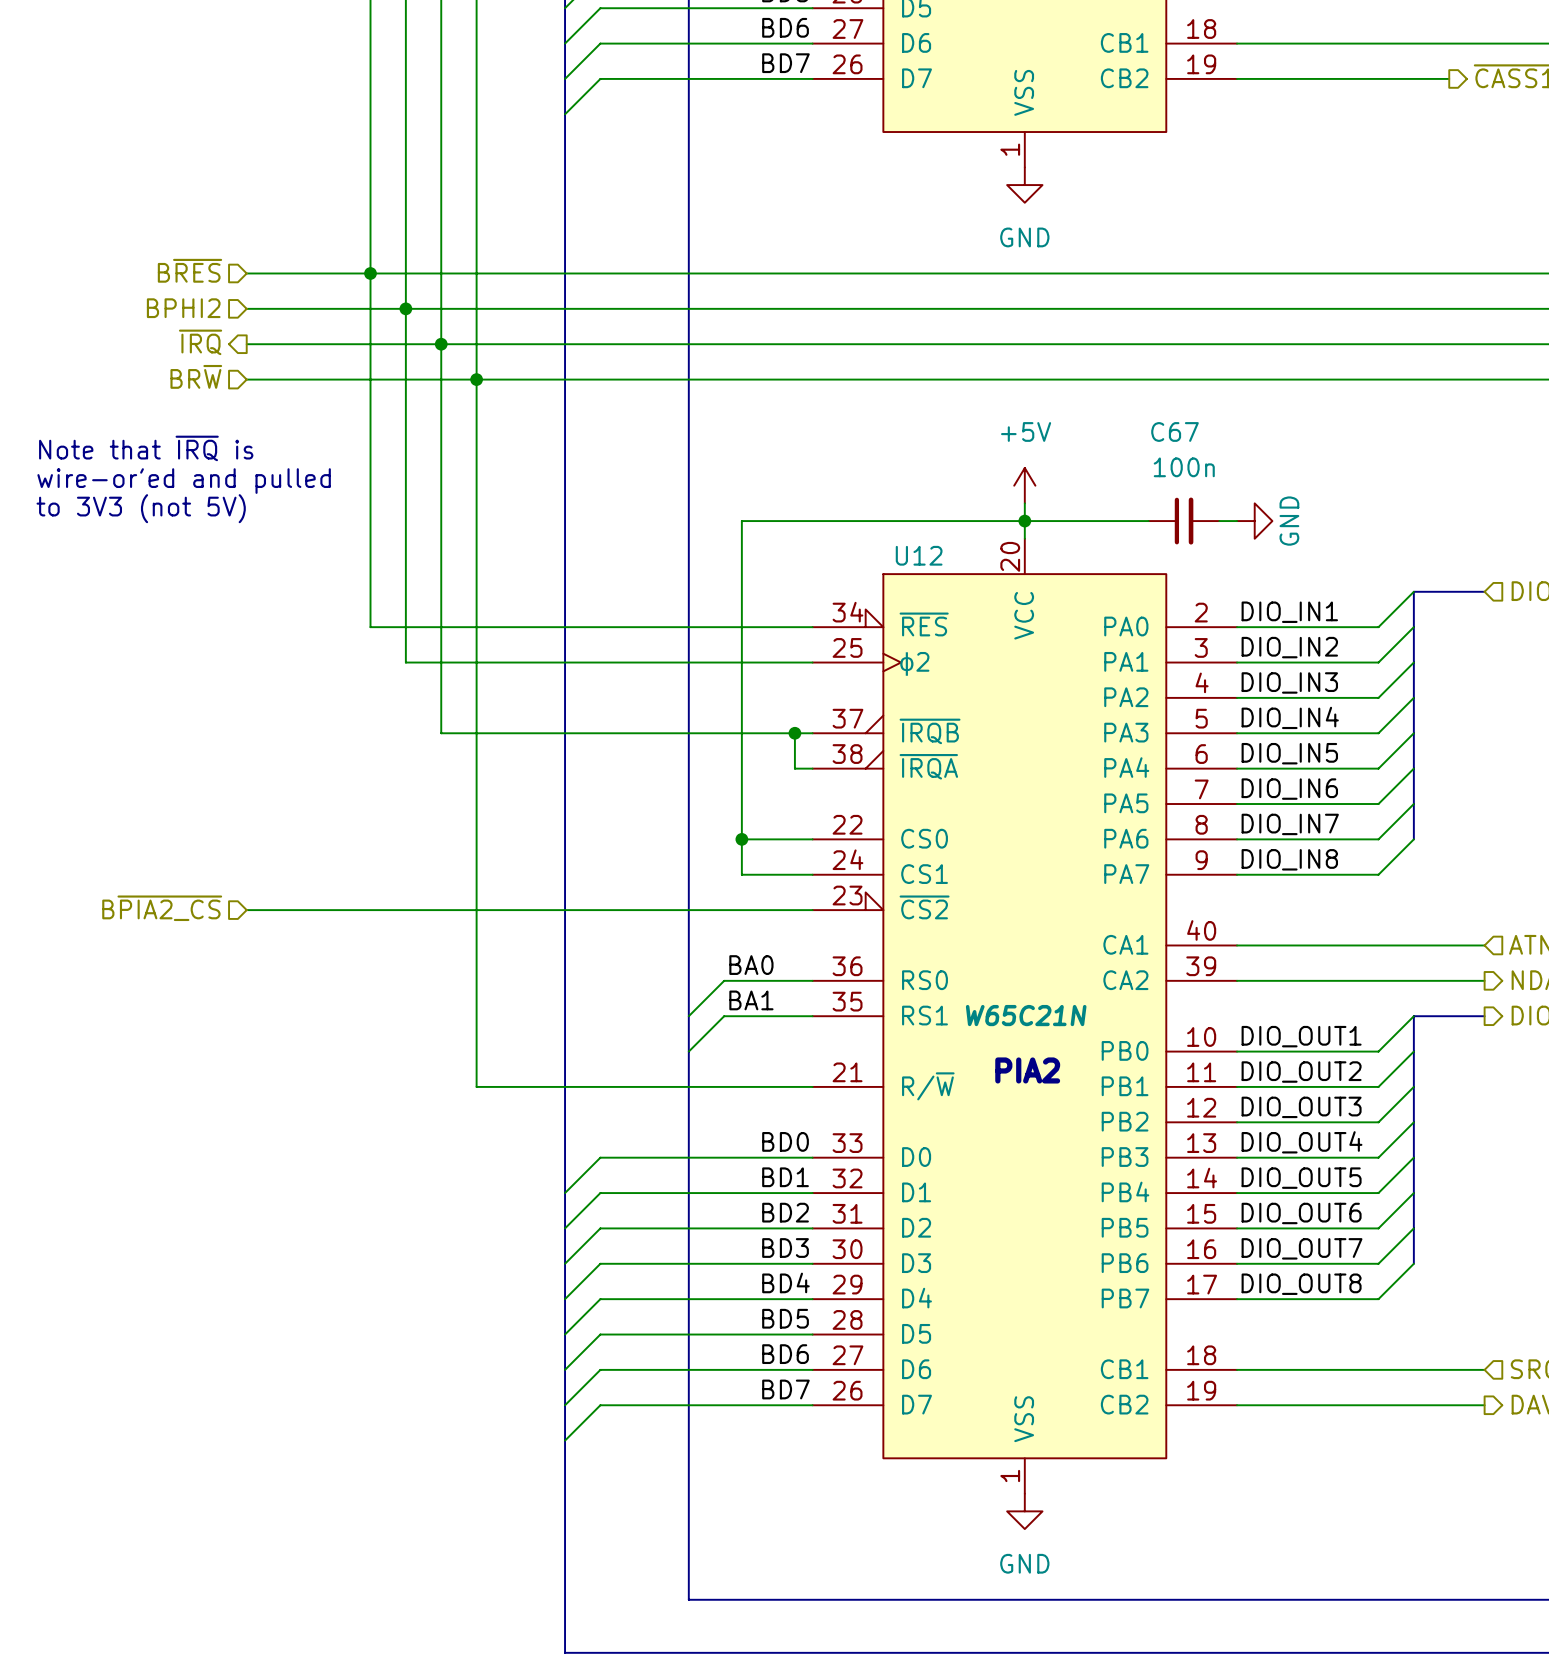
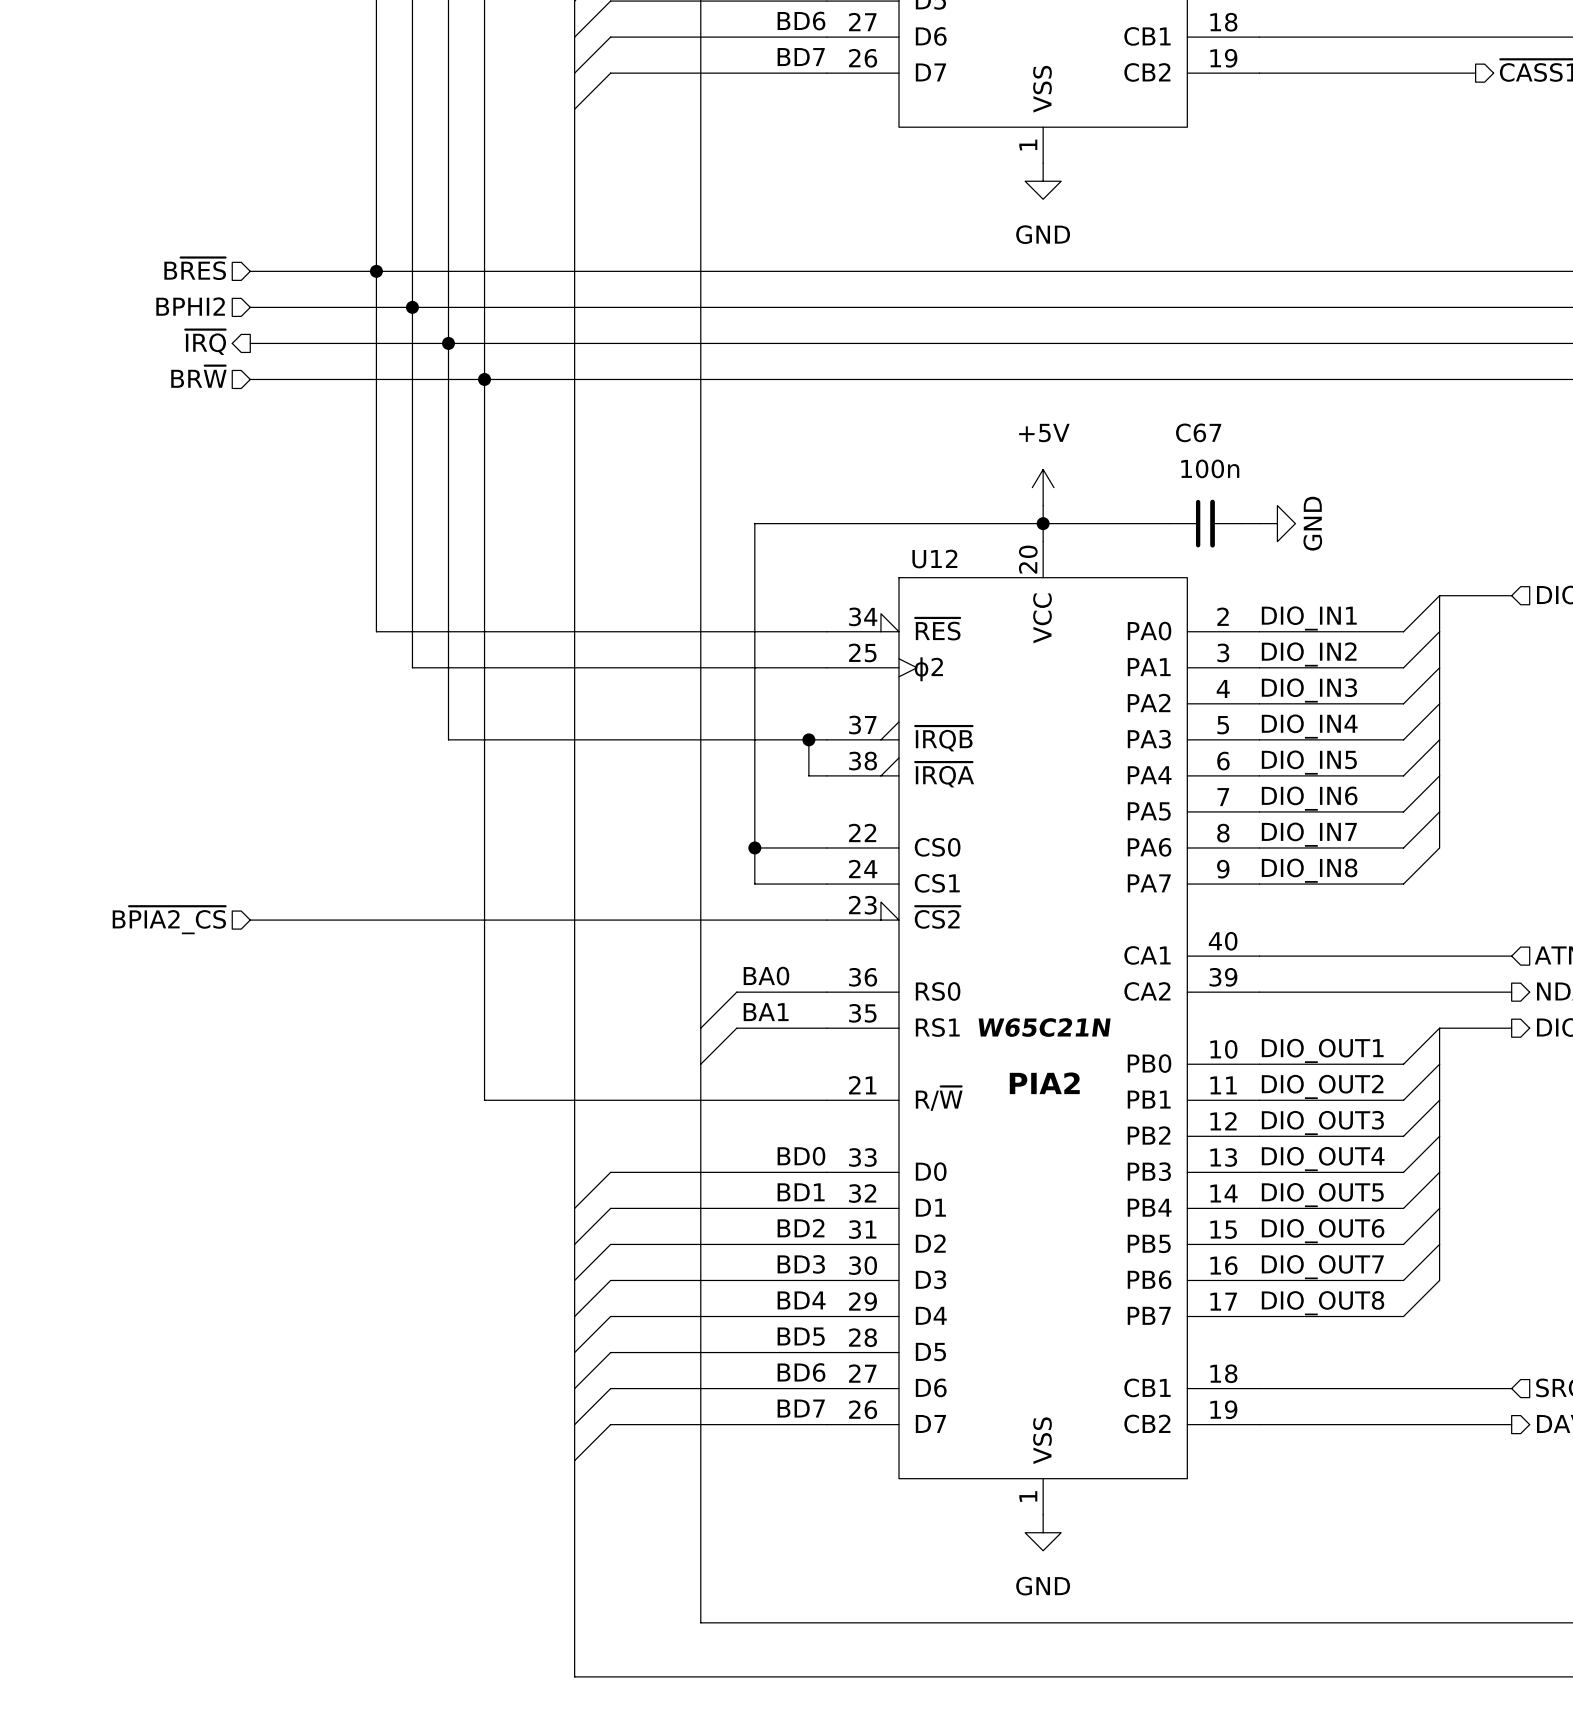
text: Note that ~{IRQ} is (146, 448) -> none
text: wire-or'ed and pulled (184, 481) -> none
text: to 3V3 (not 5V) (141, 508) -> none

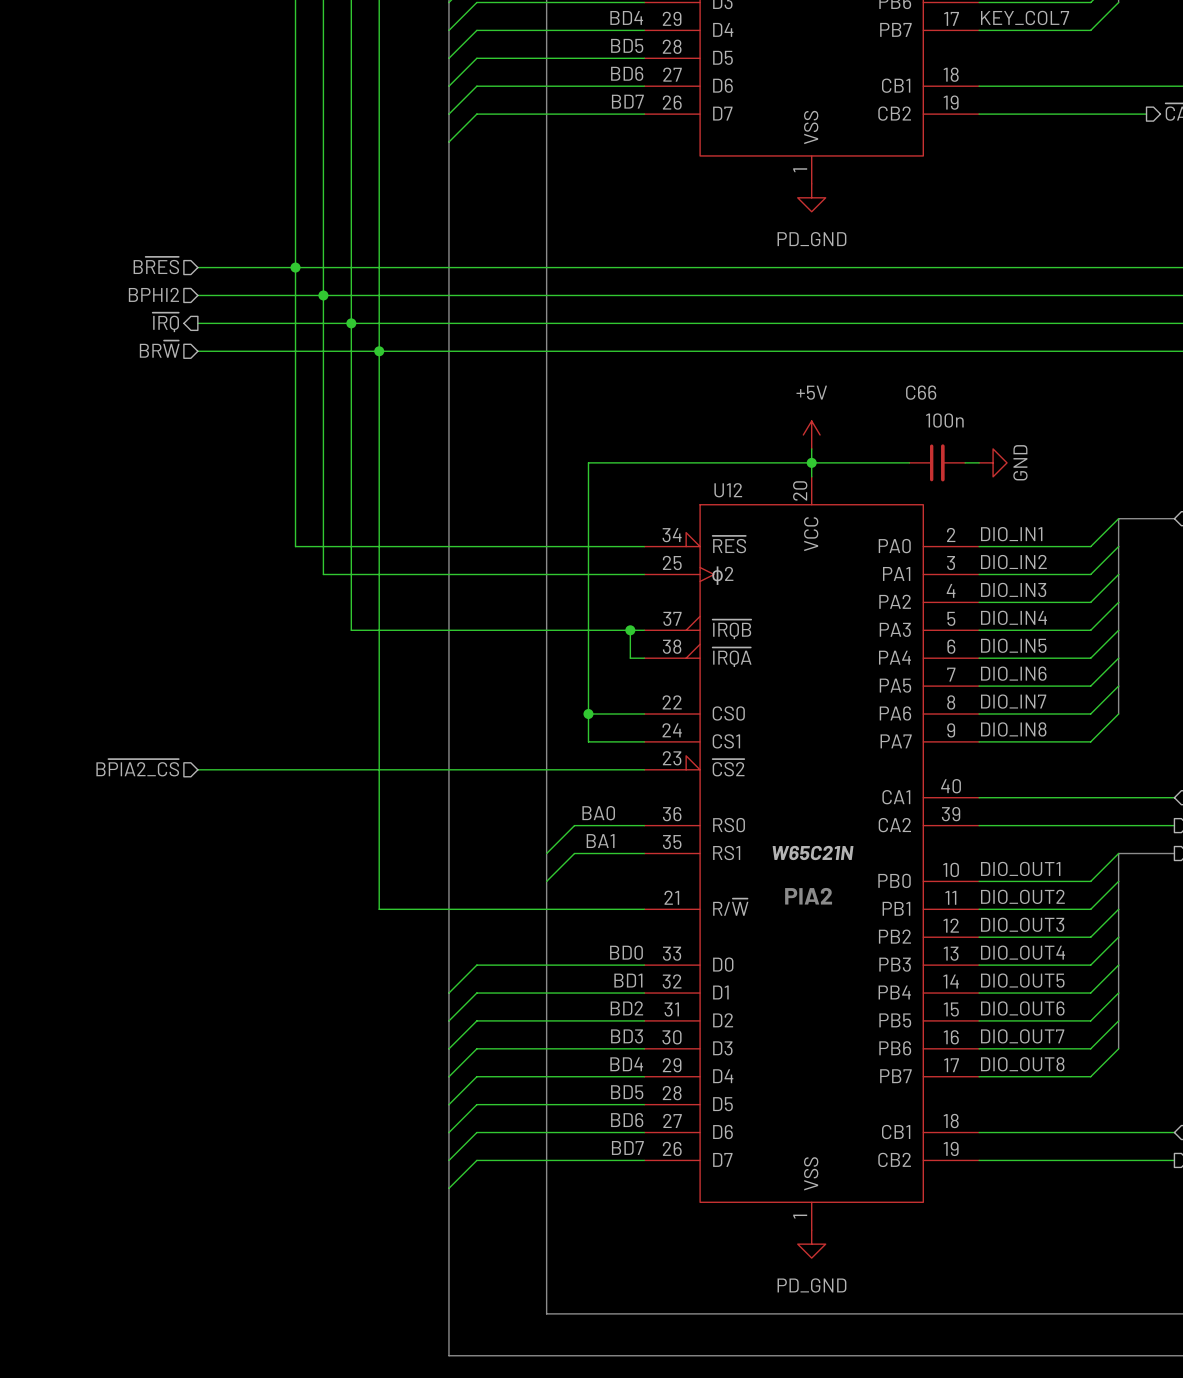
power symbol: GND (1043, 181) -> PD_GND (811, 197)
C67 name: C67 (1198, 432) -> C66 (921, 392)
power symbol: GND (1043, 1532) -> PD_GND (811, 1244)

